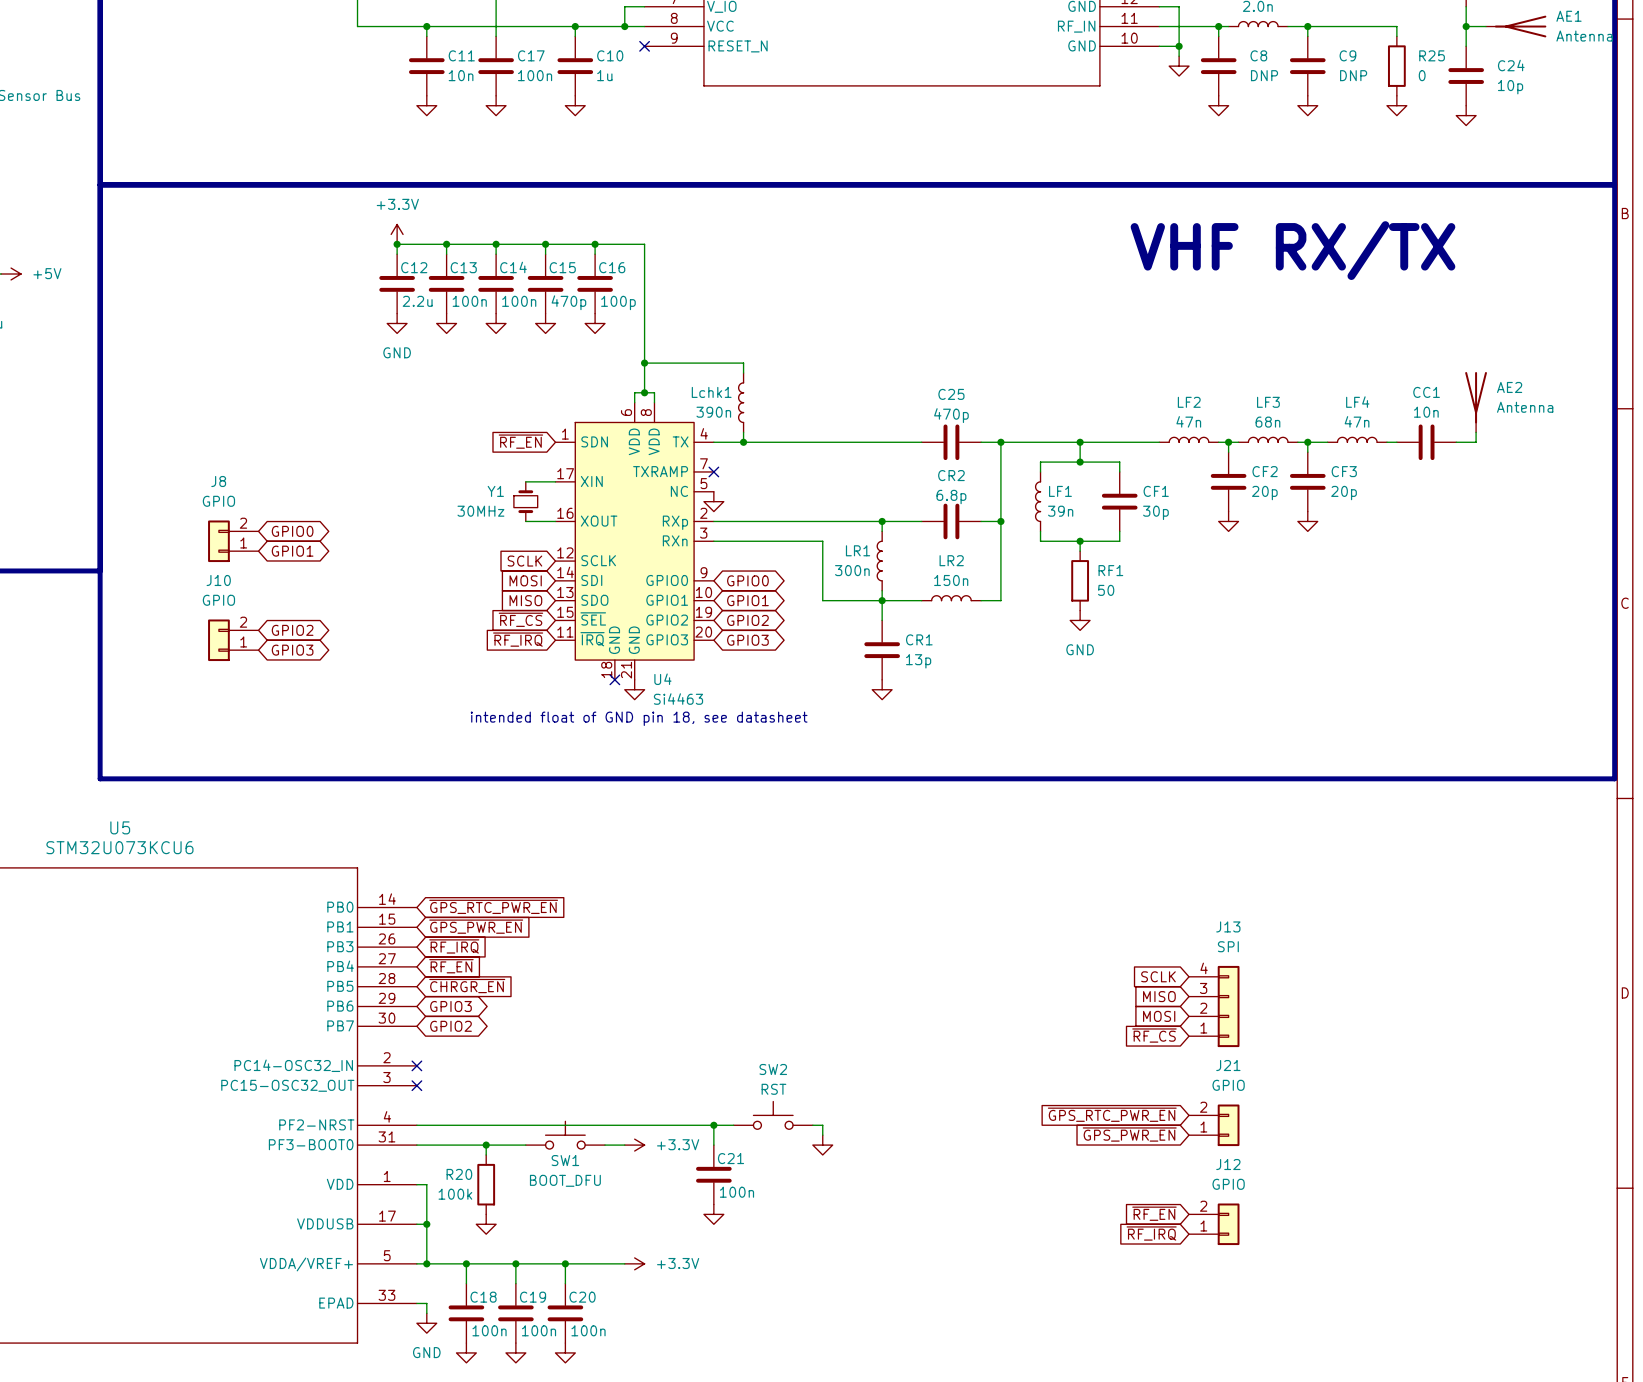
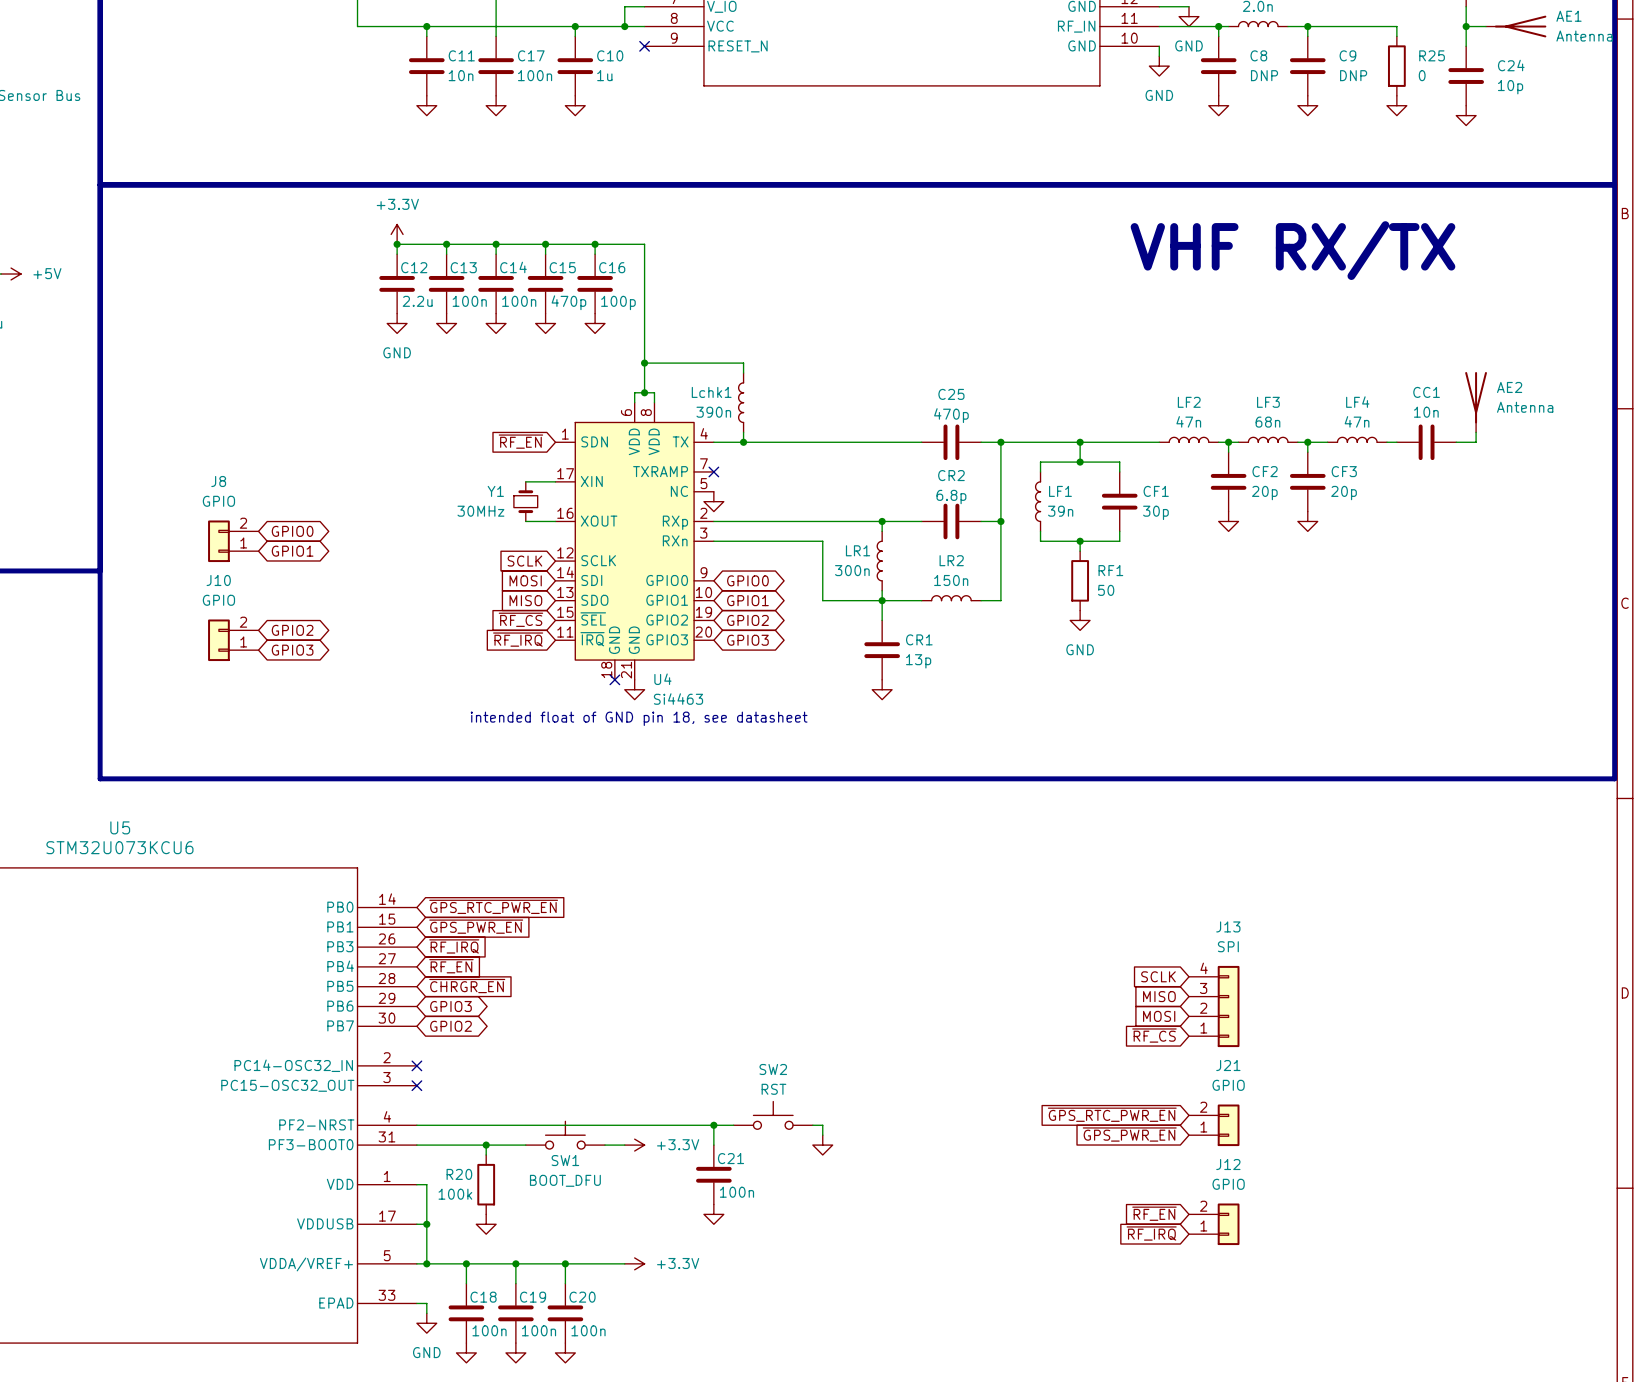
wire: (1179, 6) (1179, 56) -> (1179, 6) (1189, 6)
power symbol: none -> GND (1189, 16)
wire: (1159, 46) (1179, 46) -> (1159, 46) (1159, 56)
junction: (1179, 46) -> none
power symbol: none -> GND (1159, 66)
power symbol: (1179, 66) -> none

